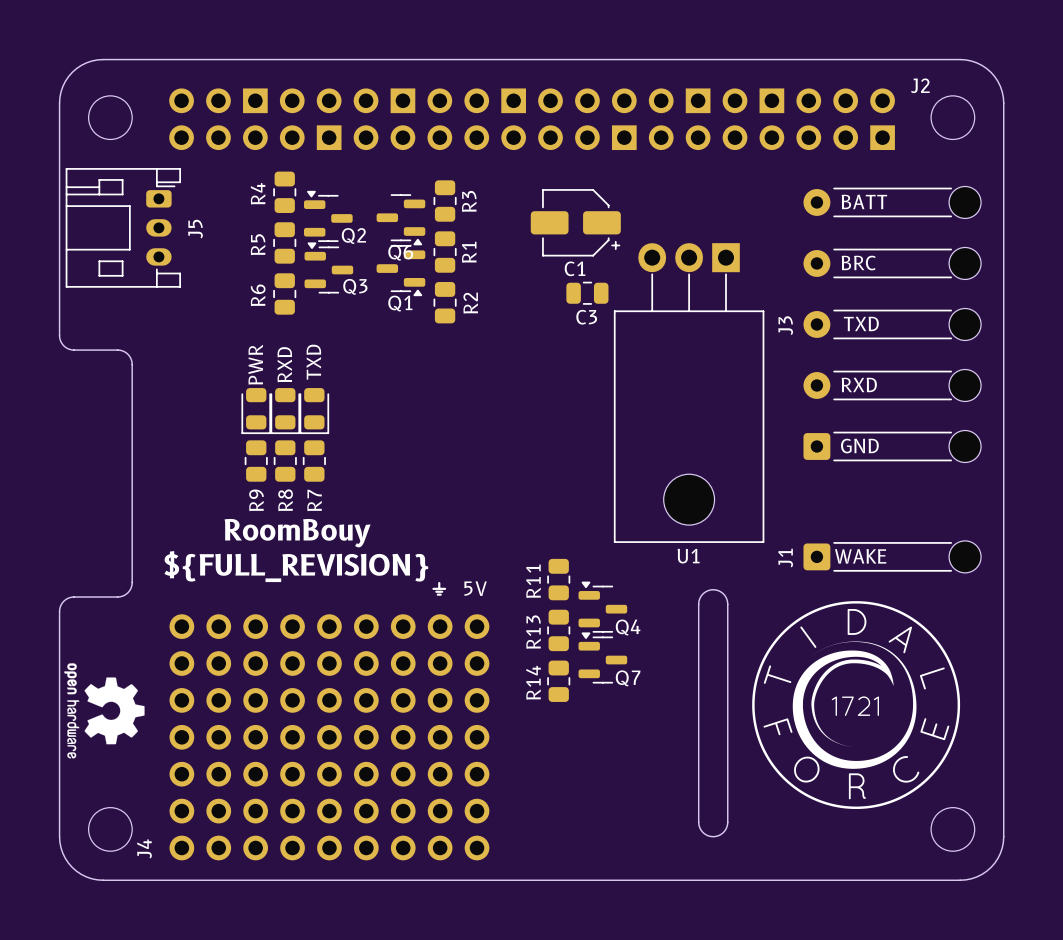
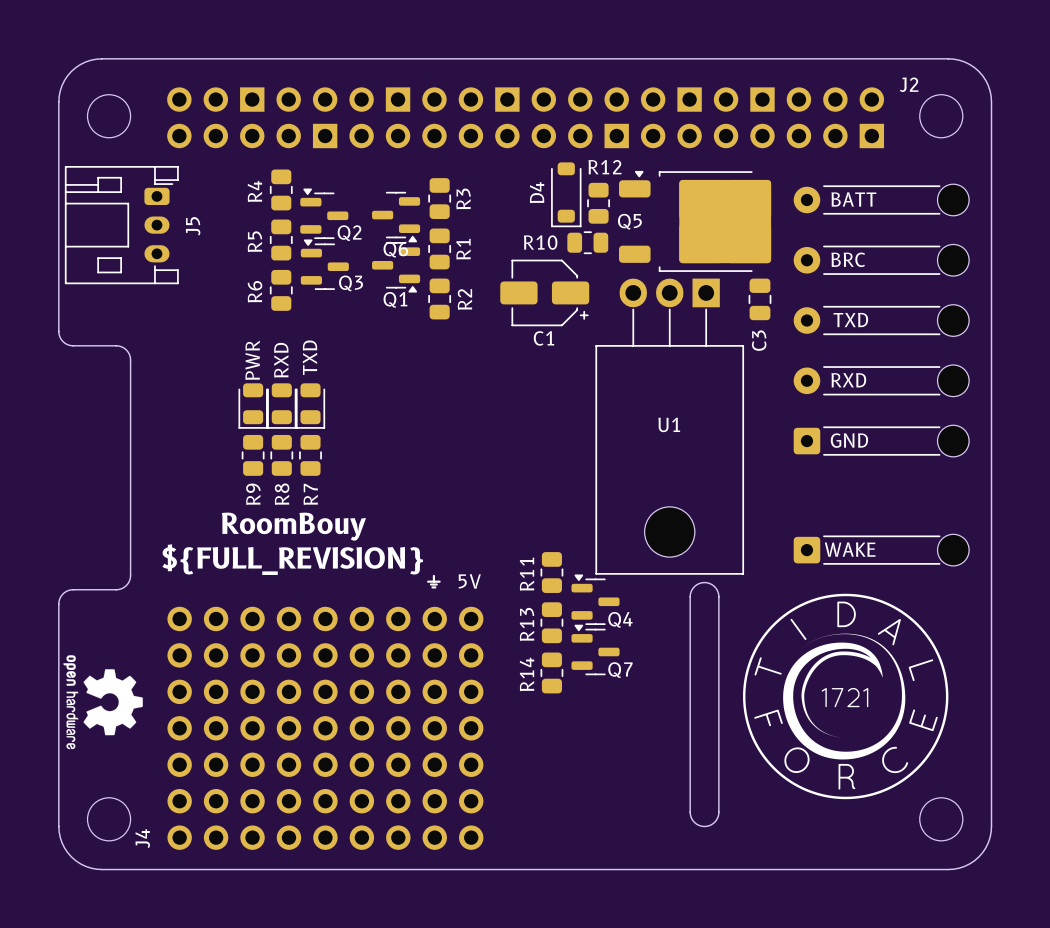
D4: none -> (566, 194)
R12: none -> (598, 203)
C1 position: (575, 222) -> (544, 292)
Q5: none -> (695, 221)
R10: none -> (587, 242)
C3 rotation: 0° (587, 293) -> 90° clockwise (759, 299)
C3 position: (587, 293) -> (759, 299)
J3 name: J3 (785, 325) -> none
U1 position: (689, 393) -> (669, 426)
U1 name position: U1 (688, 556) -> U1 (669, 424)
J1 name: J1 (785, 558) -> none

